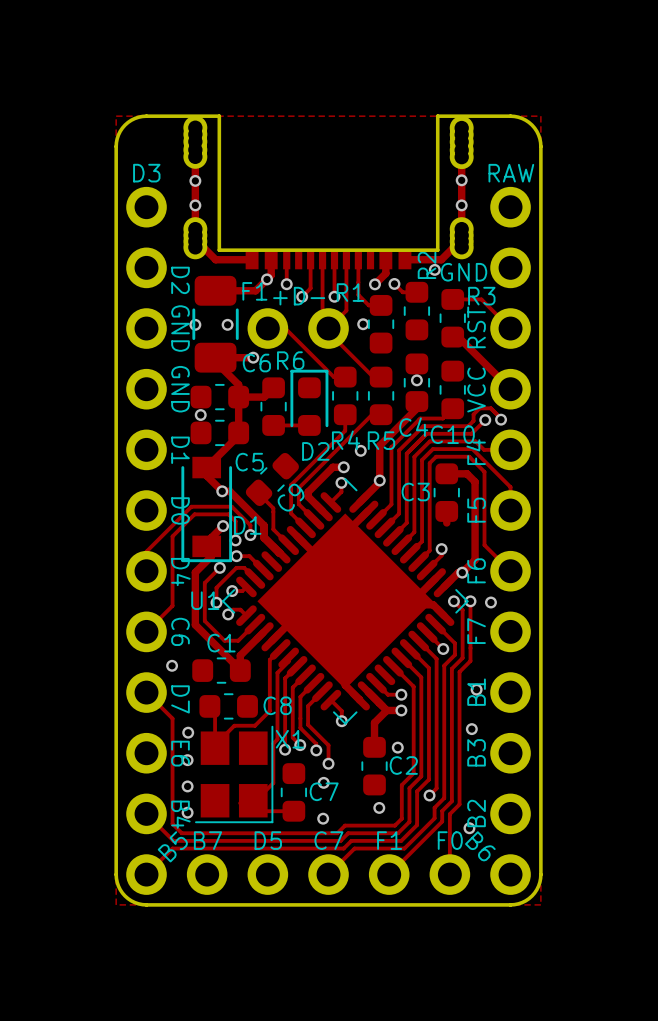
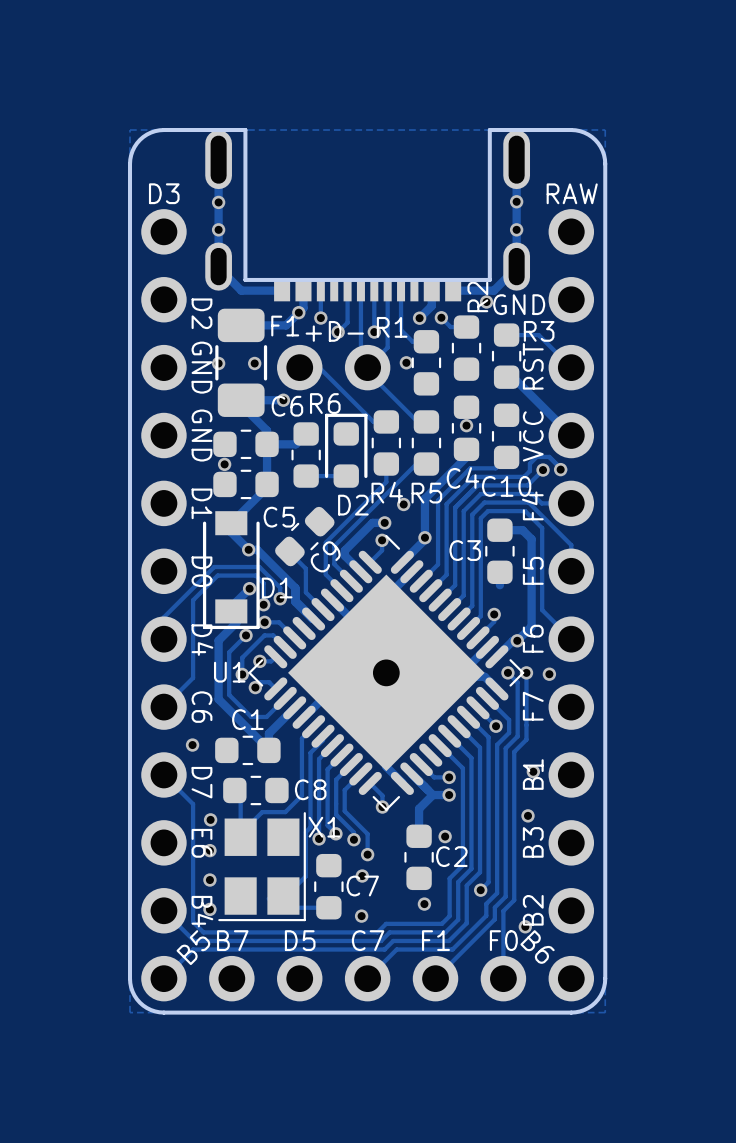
part footprint: [183, 115, 474, 270] -> [205, 130, 531, 302]
U1 footprint: [222, 478, 469, 725] -> [248, 534, 525, 811]

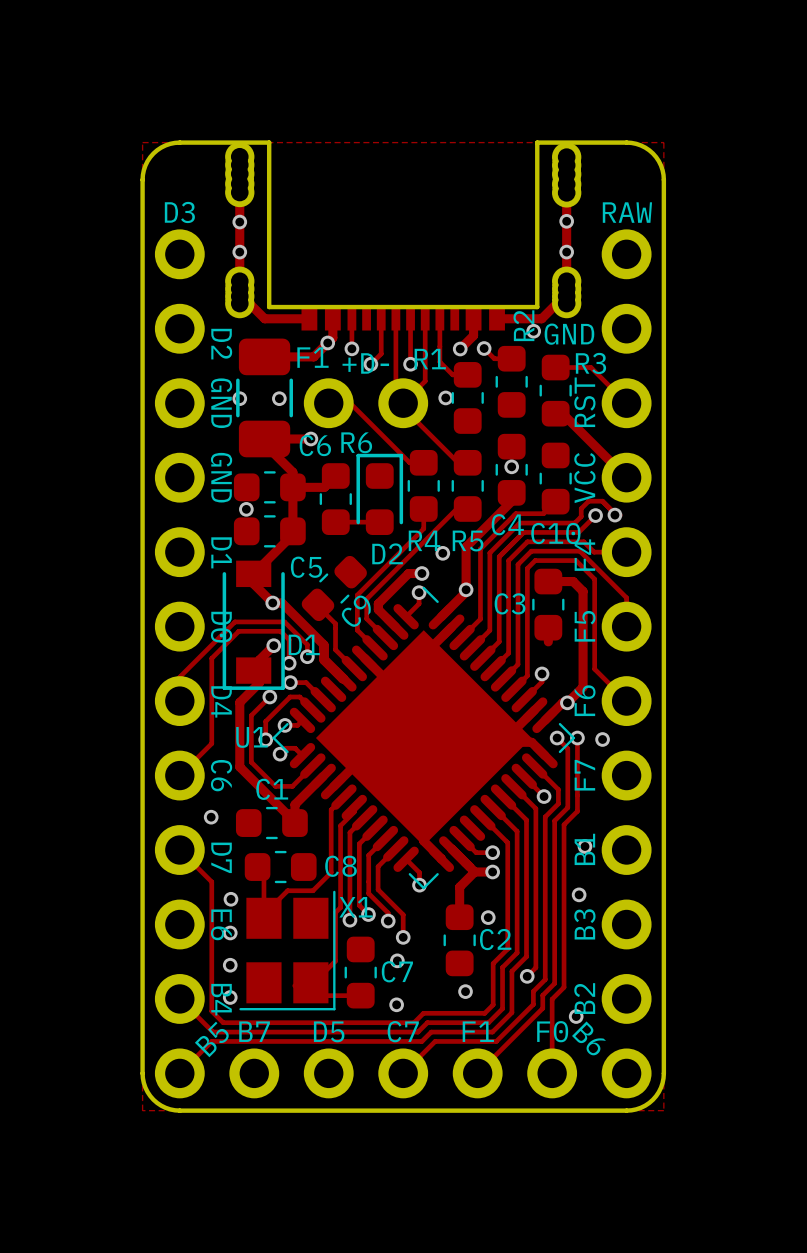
part footprint: [205, 130, 531, 302] -> [225, 142, 582, 331]
U1 footprint: [248, 534, 525, 811] -> [272, 586, 576, 890]

